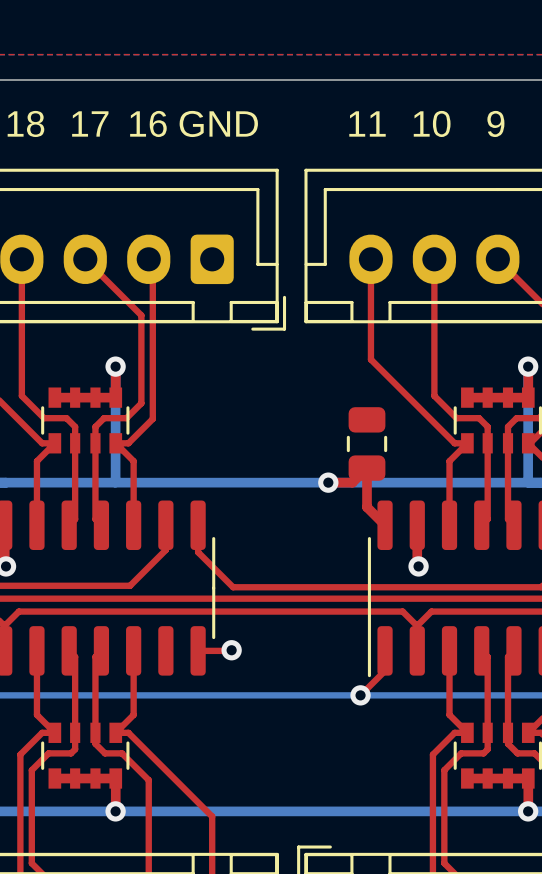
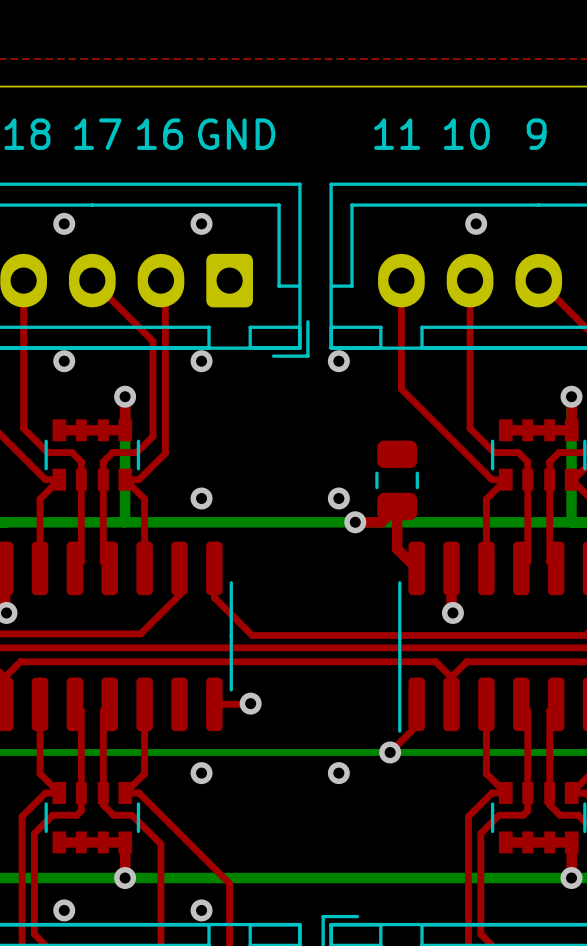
via: none -> (64, 223)
via: none -> (201, 223)
via: none -> (476, 223)
via: none -> (64, 361)
via: none -> (201, 361)
via: none -> (338, 361)
via: none -> (201, 498)
via: none -> (338, 498)
via: none -> (201, 773)
via: none -> (338, 773)
via: none -> (64, 910)
via: none -> (201, 910)

